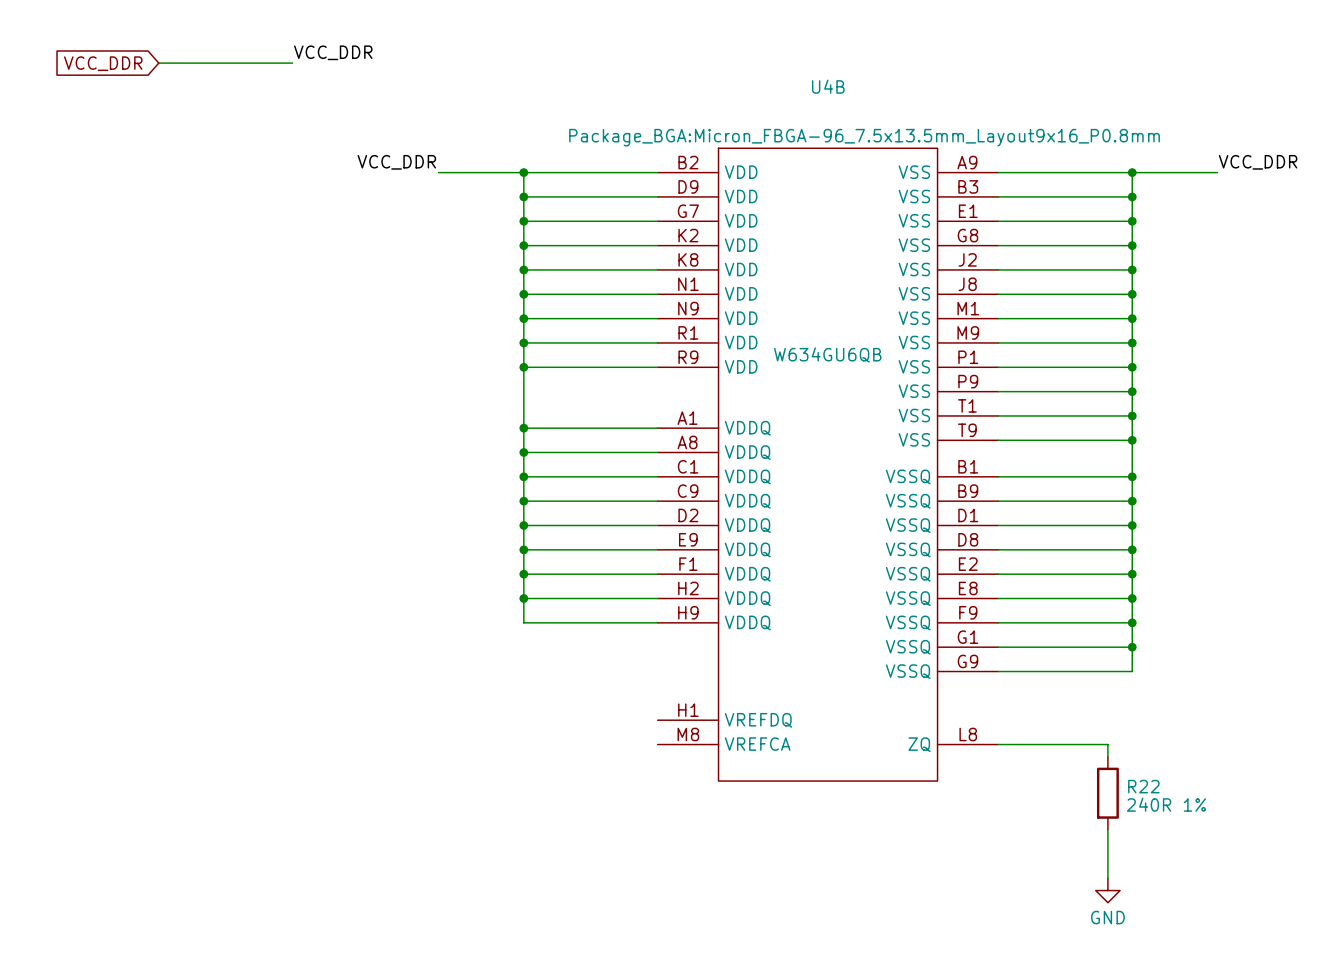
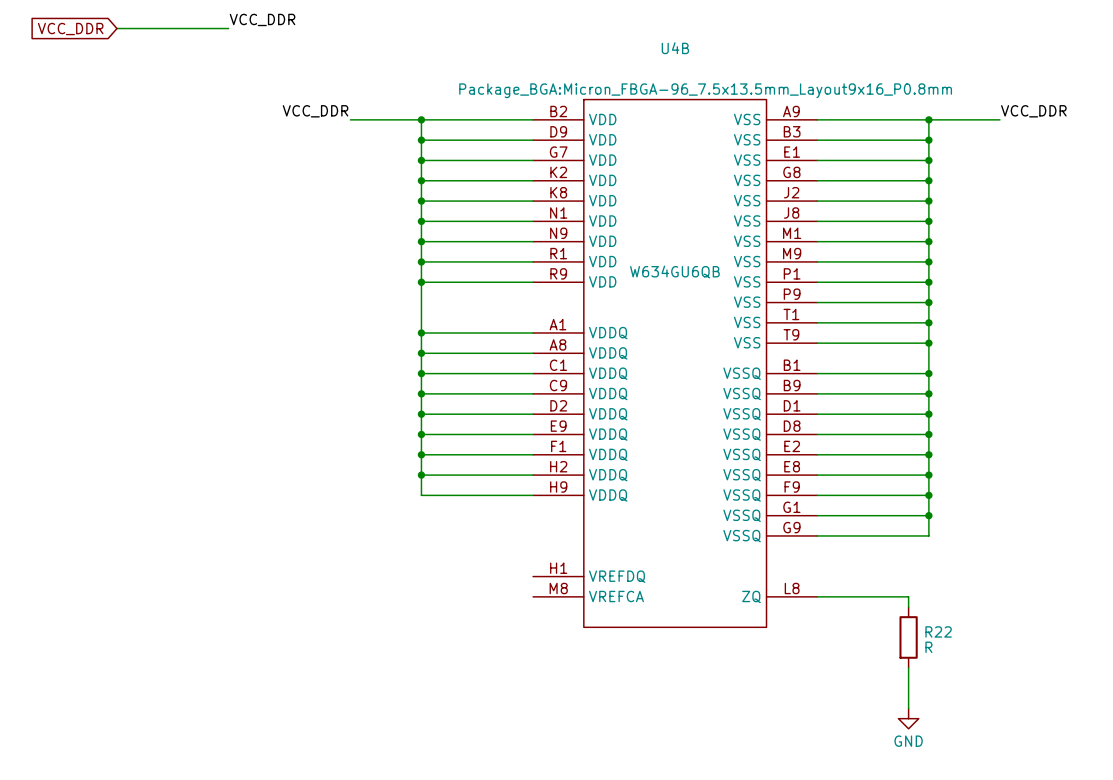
R22 value: 240R 1% (1166, 804) -> R (928, 647)

